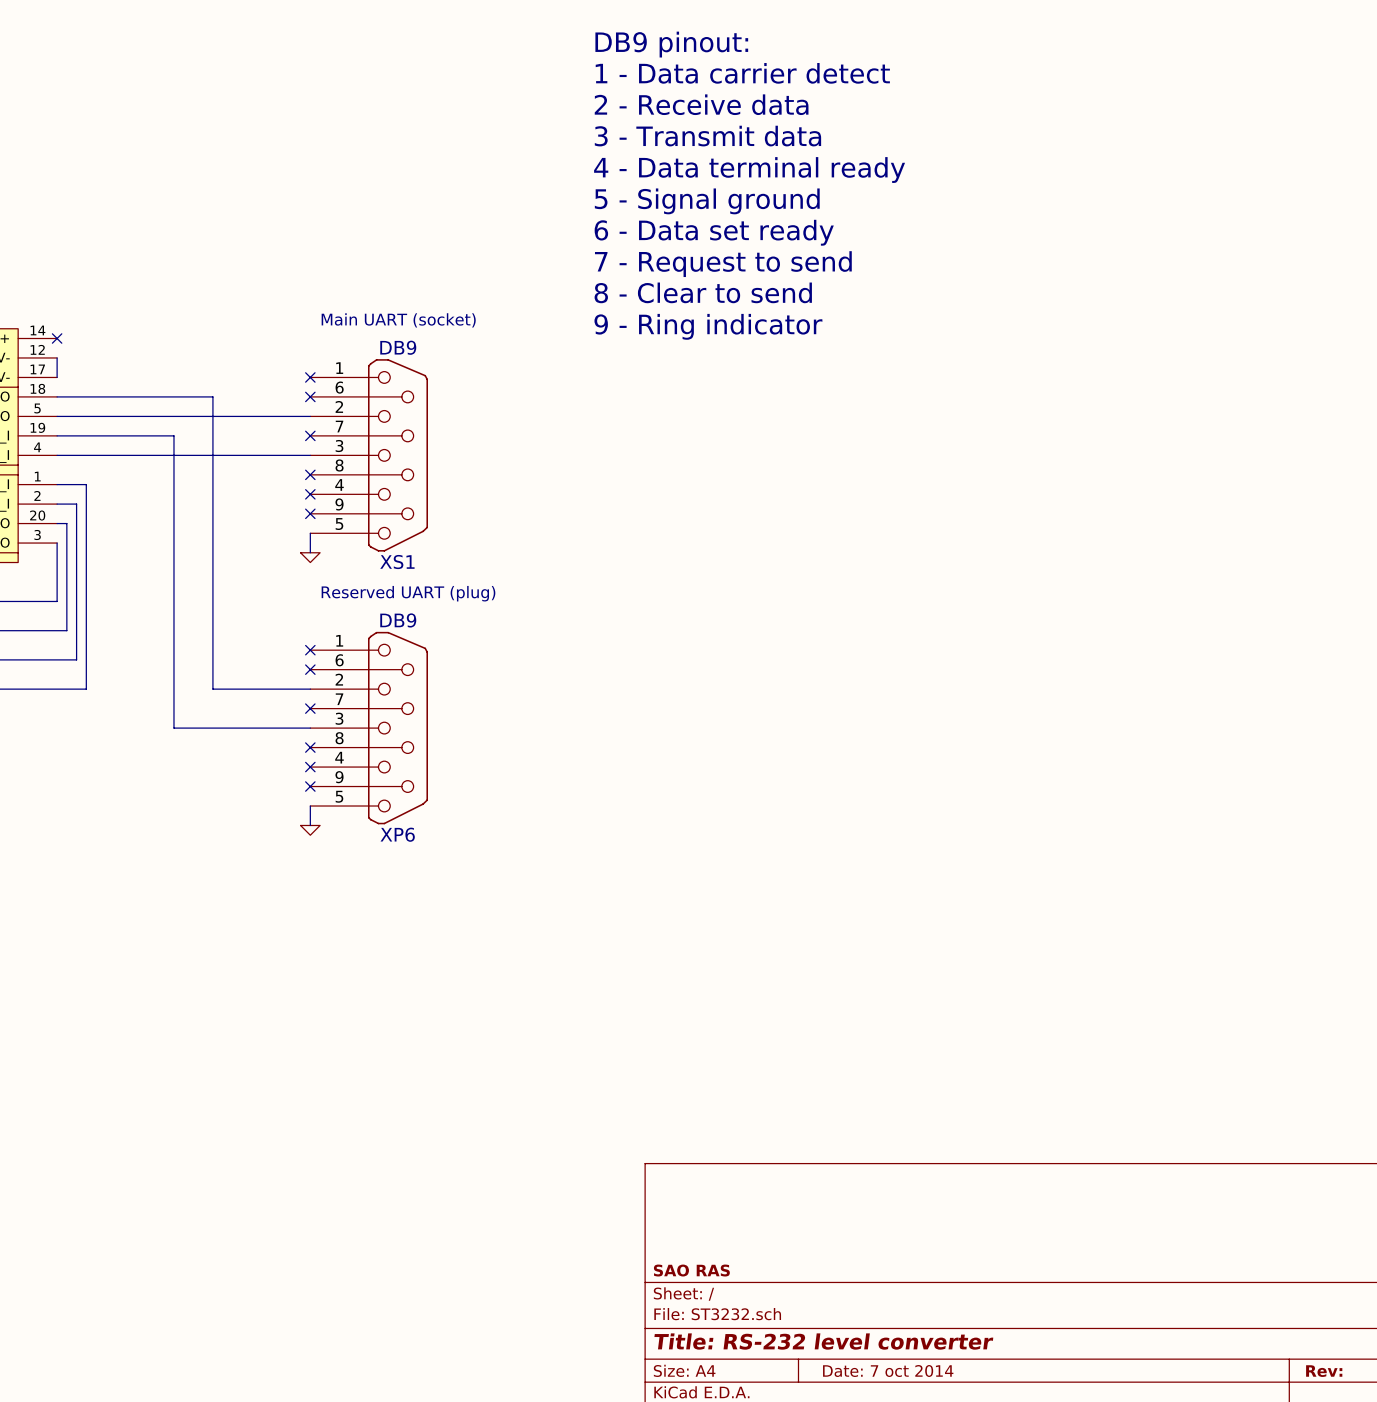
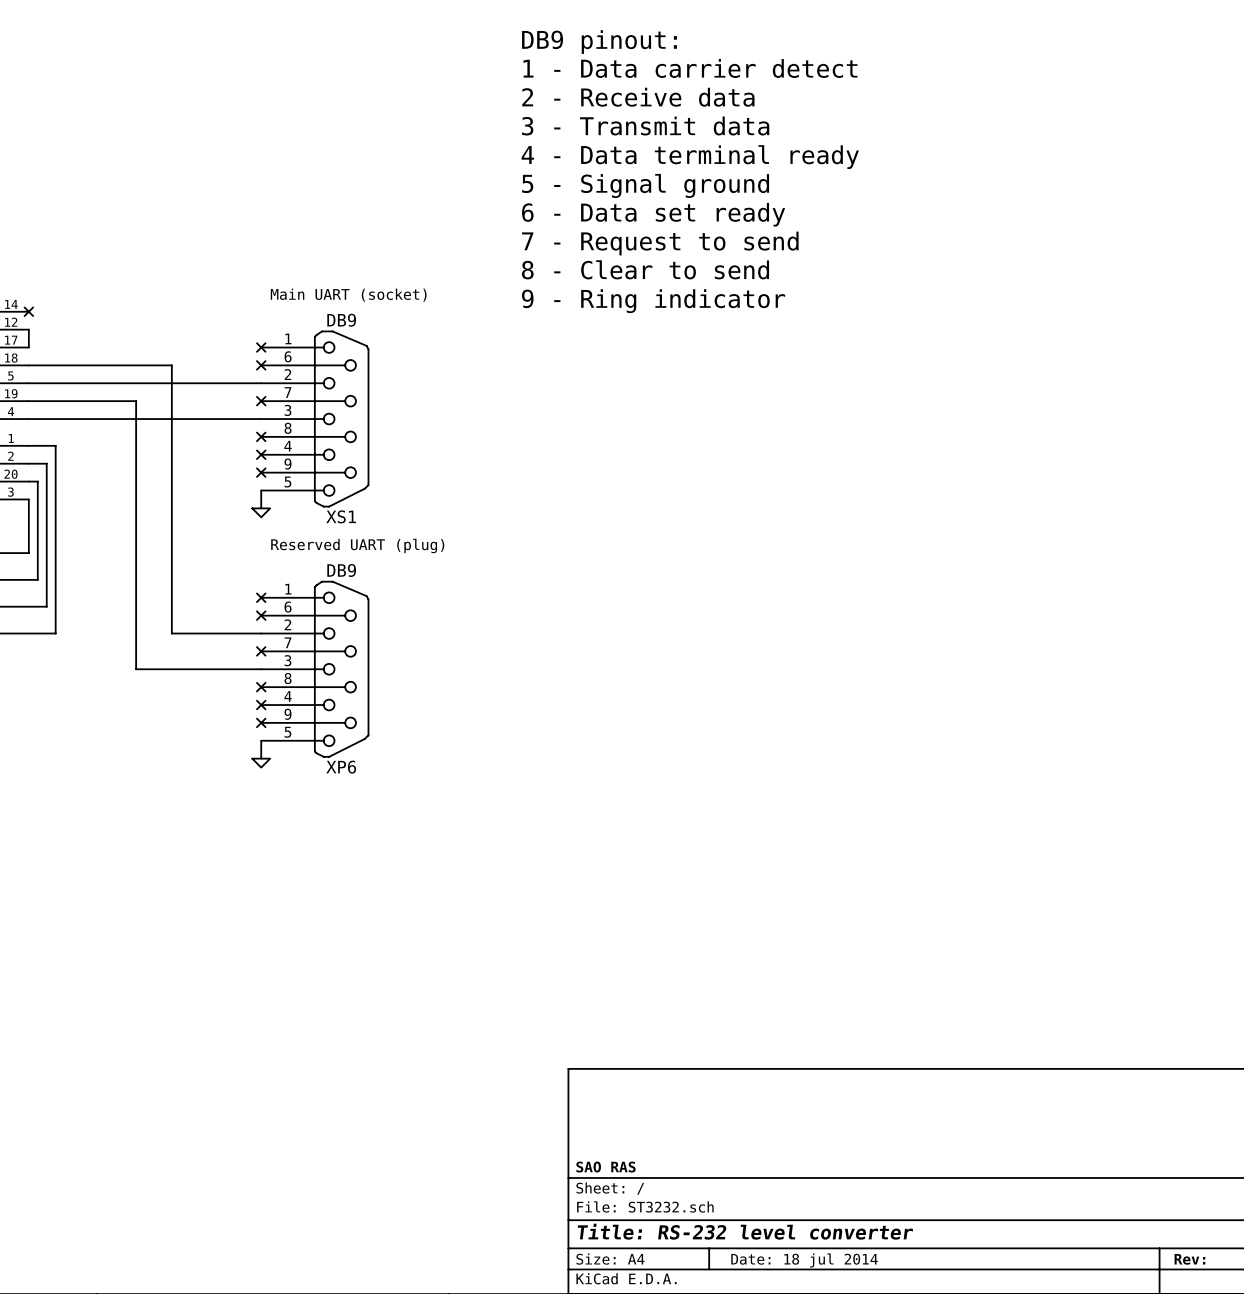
title block: Date: 7 oct 2014 (888, 1371) -> Date: 18 jul 2014 (804, 1260)

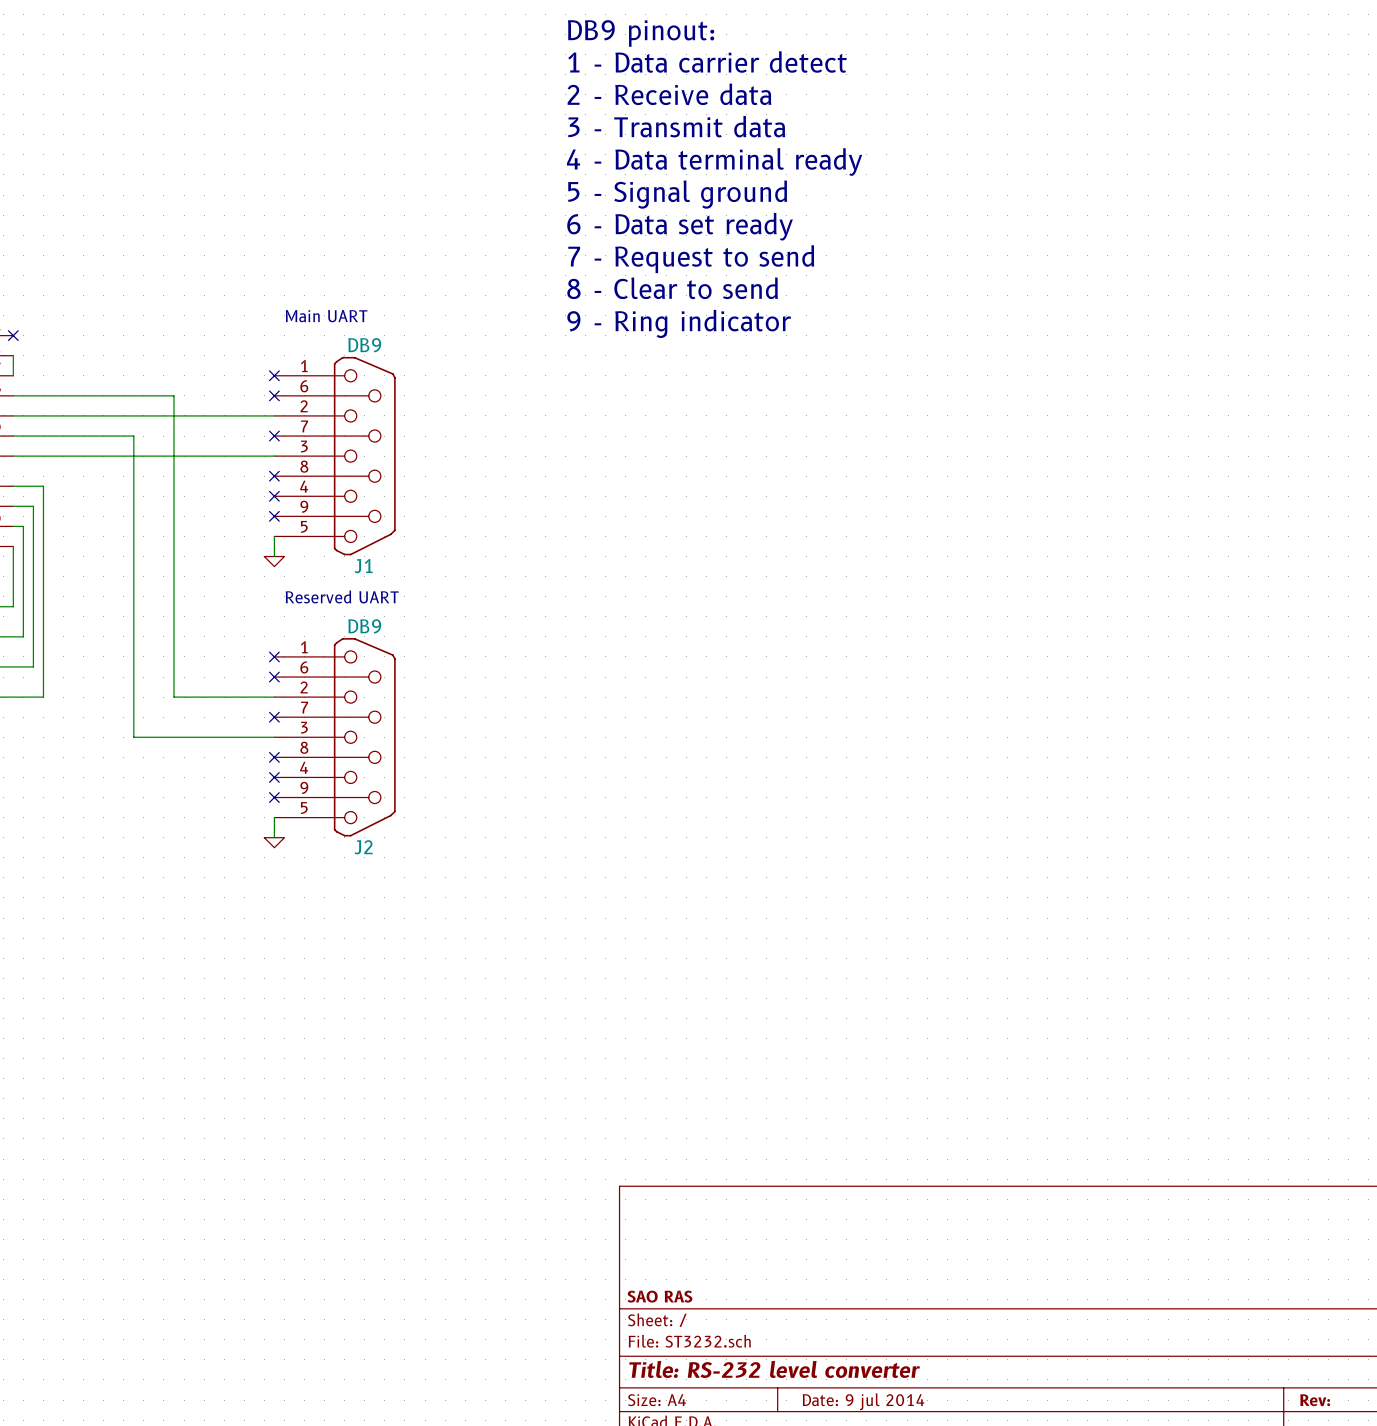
text: Main UART (socket) (348, 295) -> Main UART (326, 316)
XS1 name: XS1 (341, 516) -> J1 (363, 566)
text: Reserved UART (plug) (357, 545) -> Reserved UART (342, 596)
XP6 name: XP6 (341, 767) -> J2 (363, 847)
title block: Date: 18 jul 2014 (804, 1260) -> Date: 9 jul 2014 (863, 1401)

